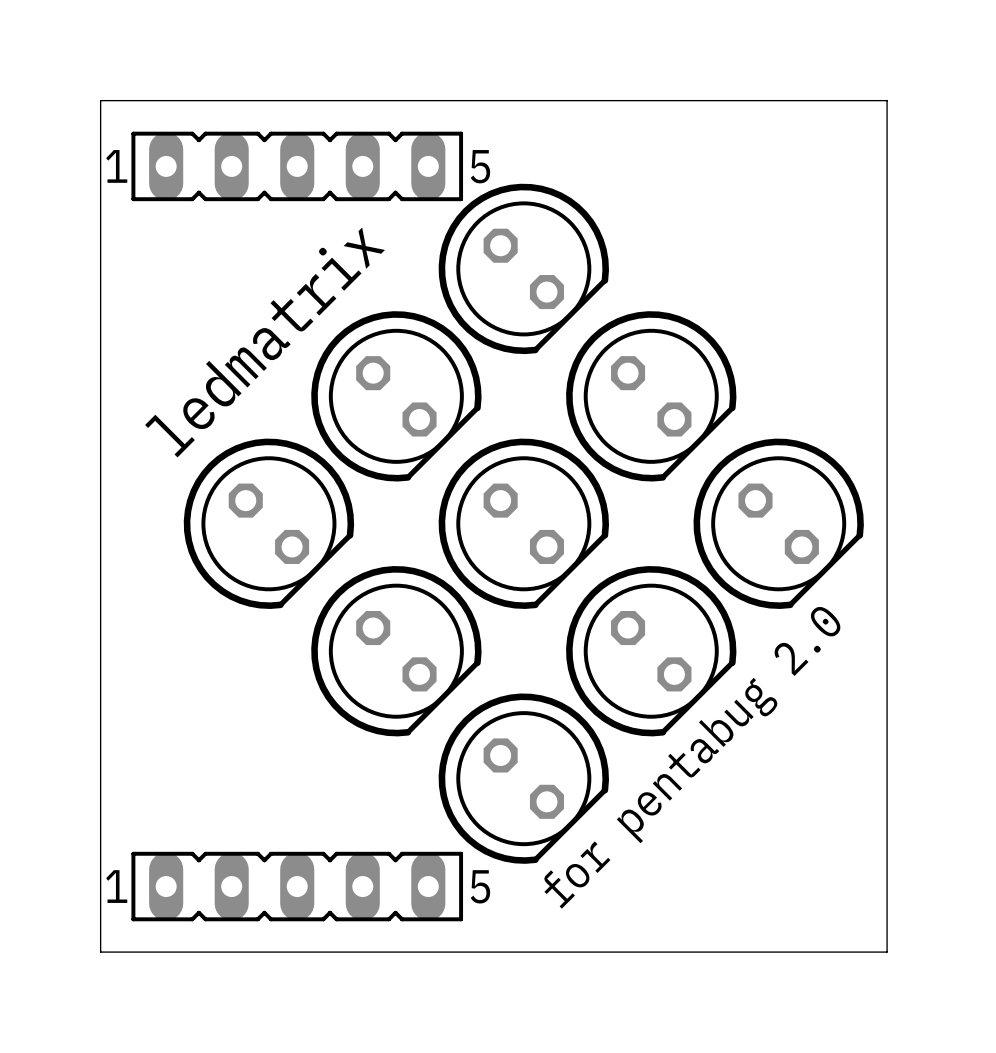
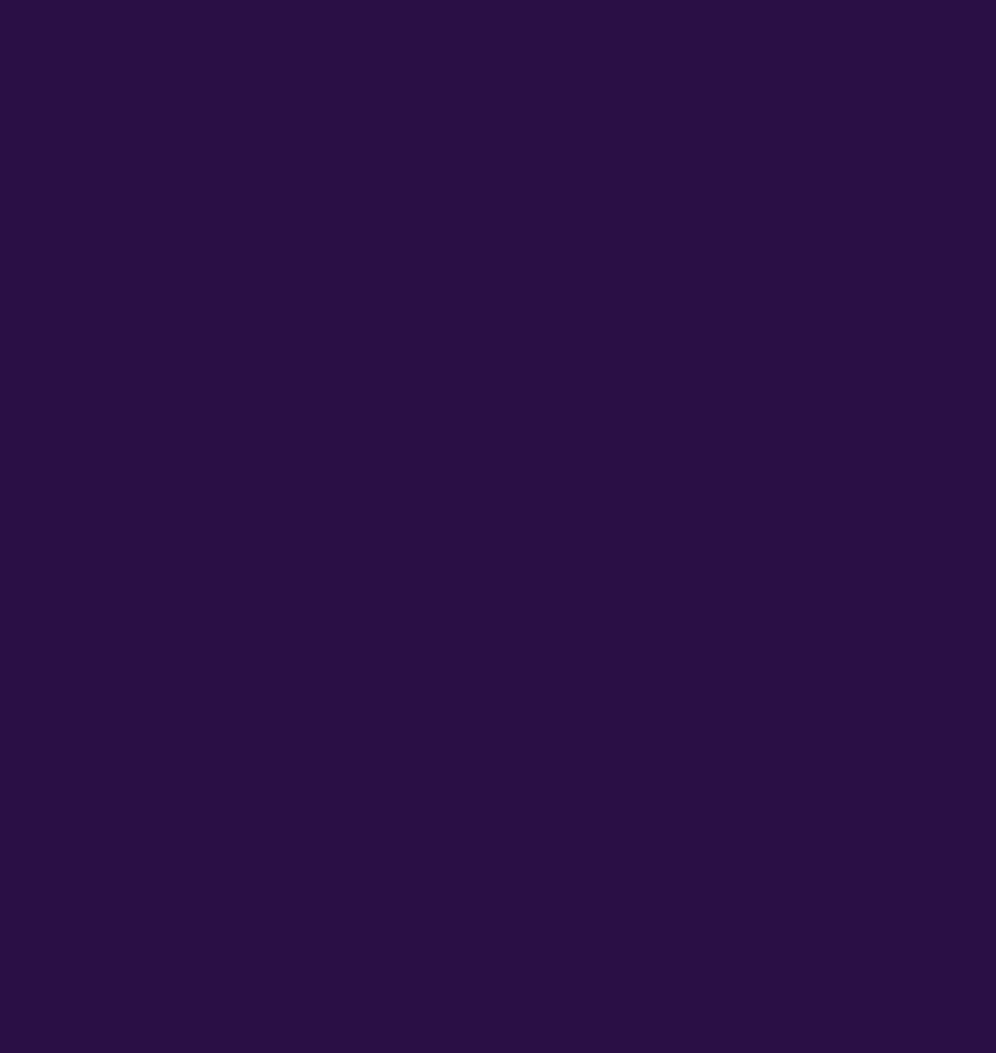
board edge: (100, 100) (887, 100) (887, 952) (100, 952) (100, 100) -> none
part: (297, 166) -> none
part: (523, 268) -> none
text: ledmatrix (265, 342) -> none
part: (396, 396) -> none
part: (651, 396) -> none
part: (268, 523) -> none
part: (523, 523) -> none
part: (778, 523) -> none
part: (396, 651) -> none
part: (651, 651) -> none
text: for pentabug 2.0 (692, 757) -> none
part: (523, 778) -> none
part: (297, 886) -> none

